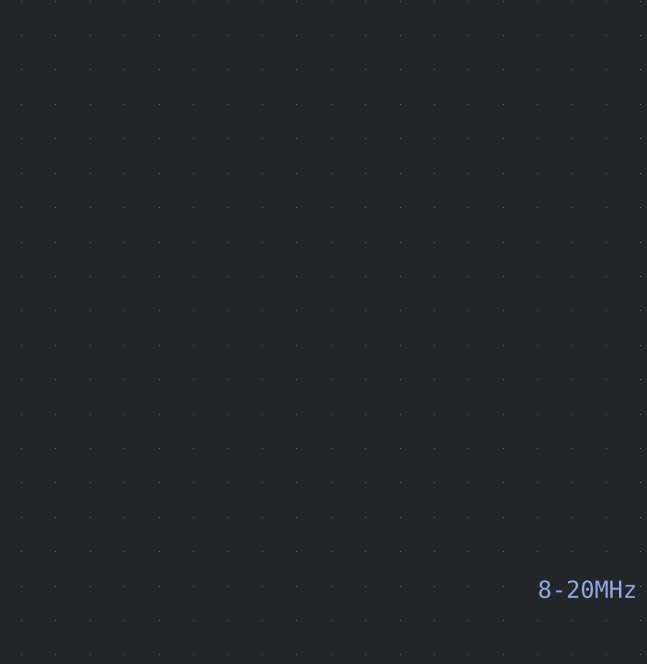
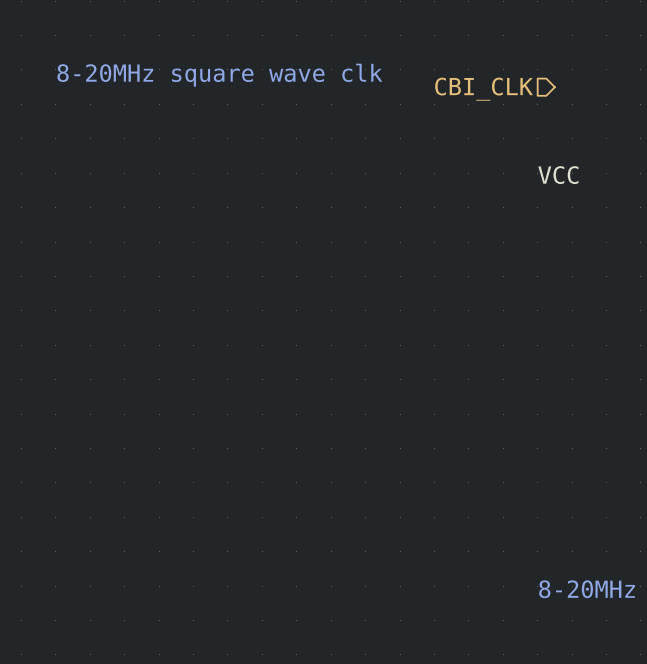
text: none -> 8-20MHz square wave clk (219, 75)
hierarchical label: none -> CBI_CLK (484, 89)
label: none -> VCC (558, 175)

